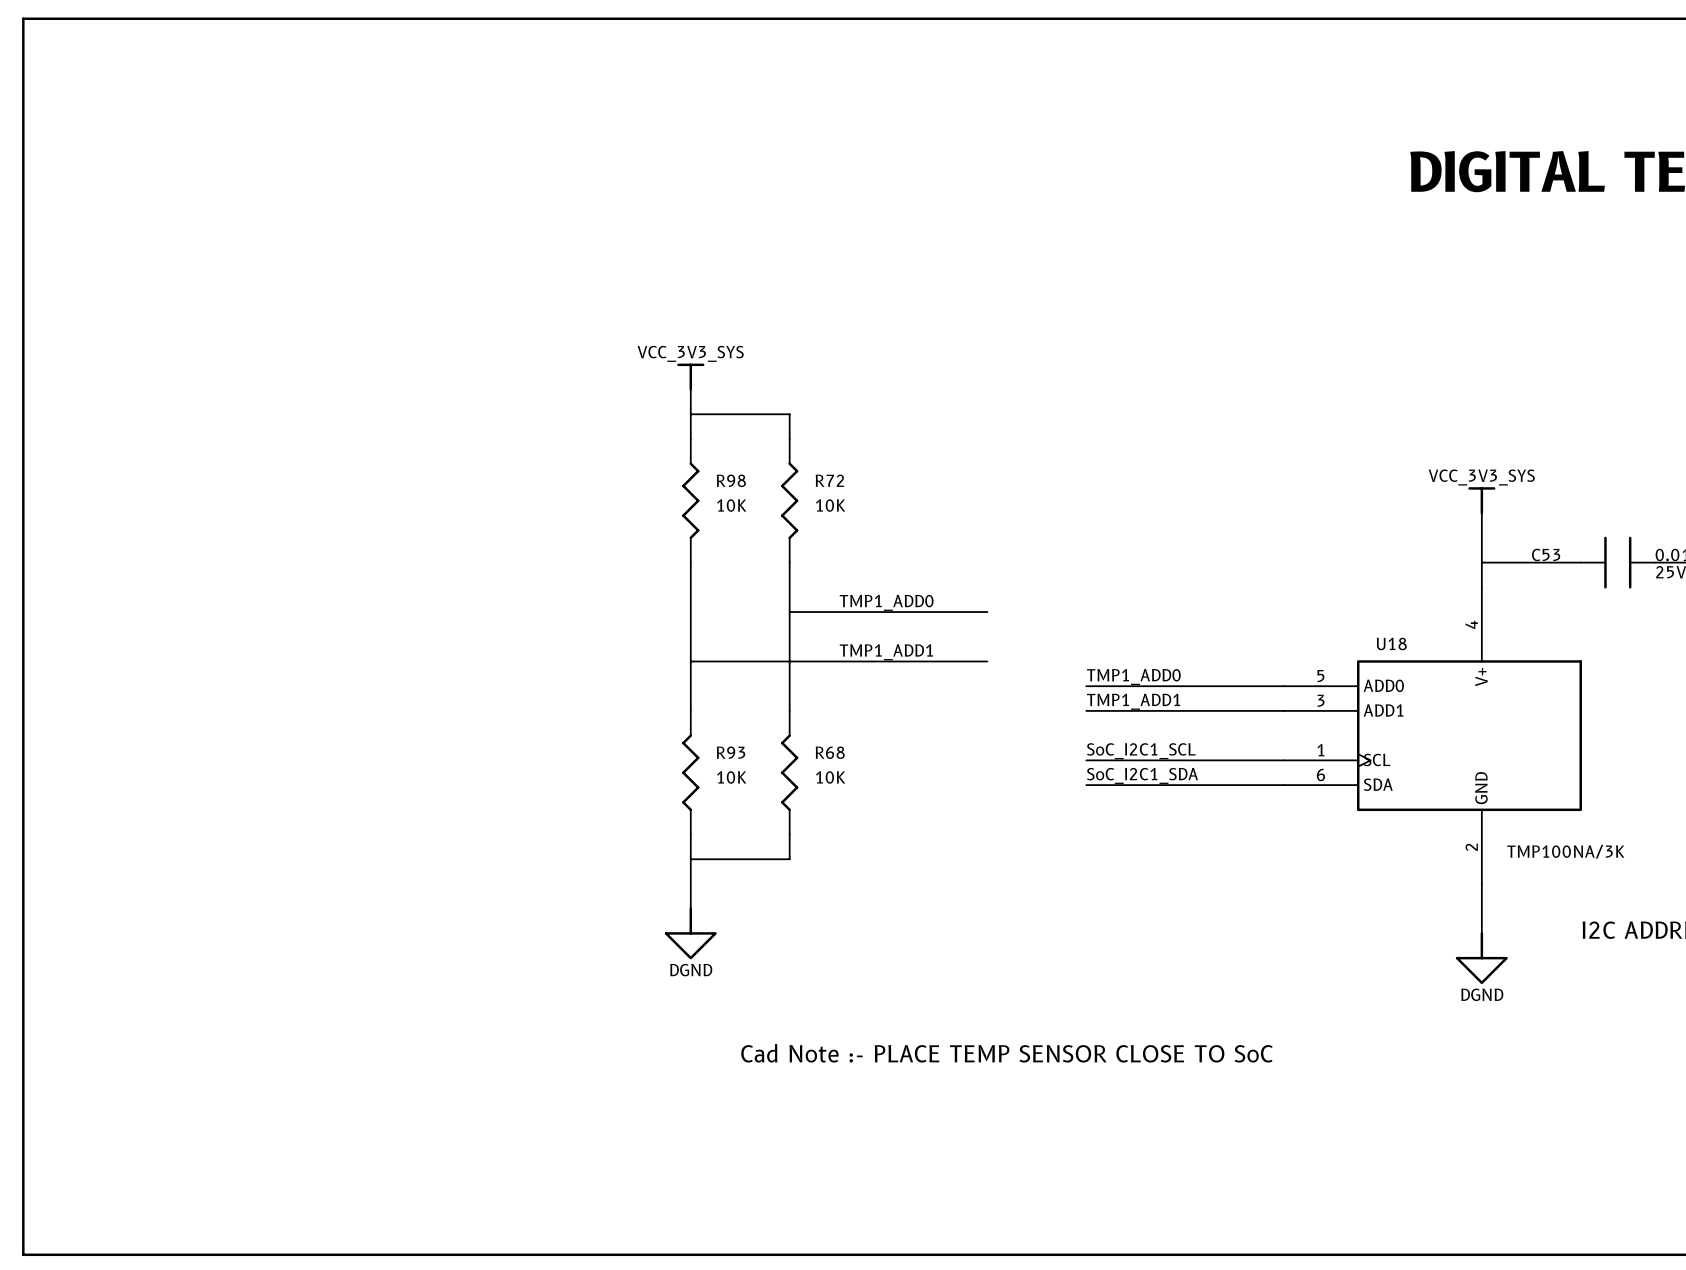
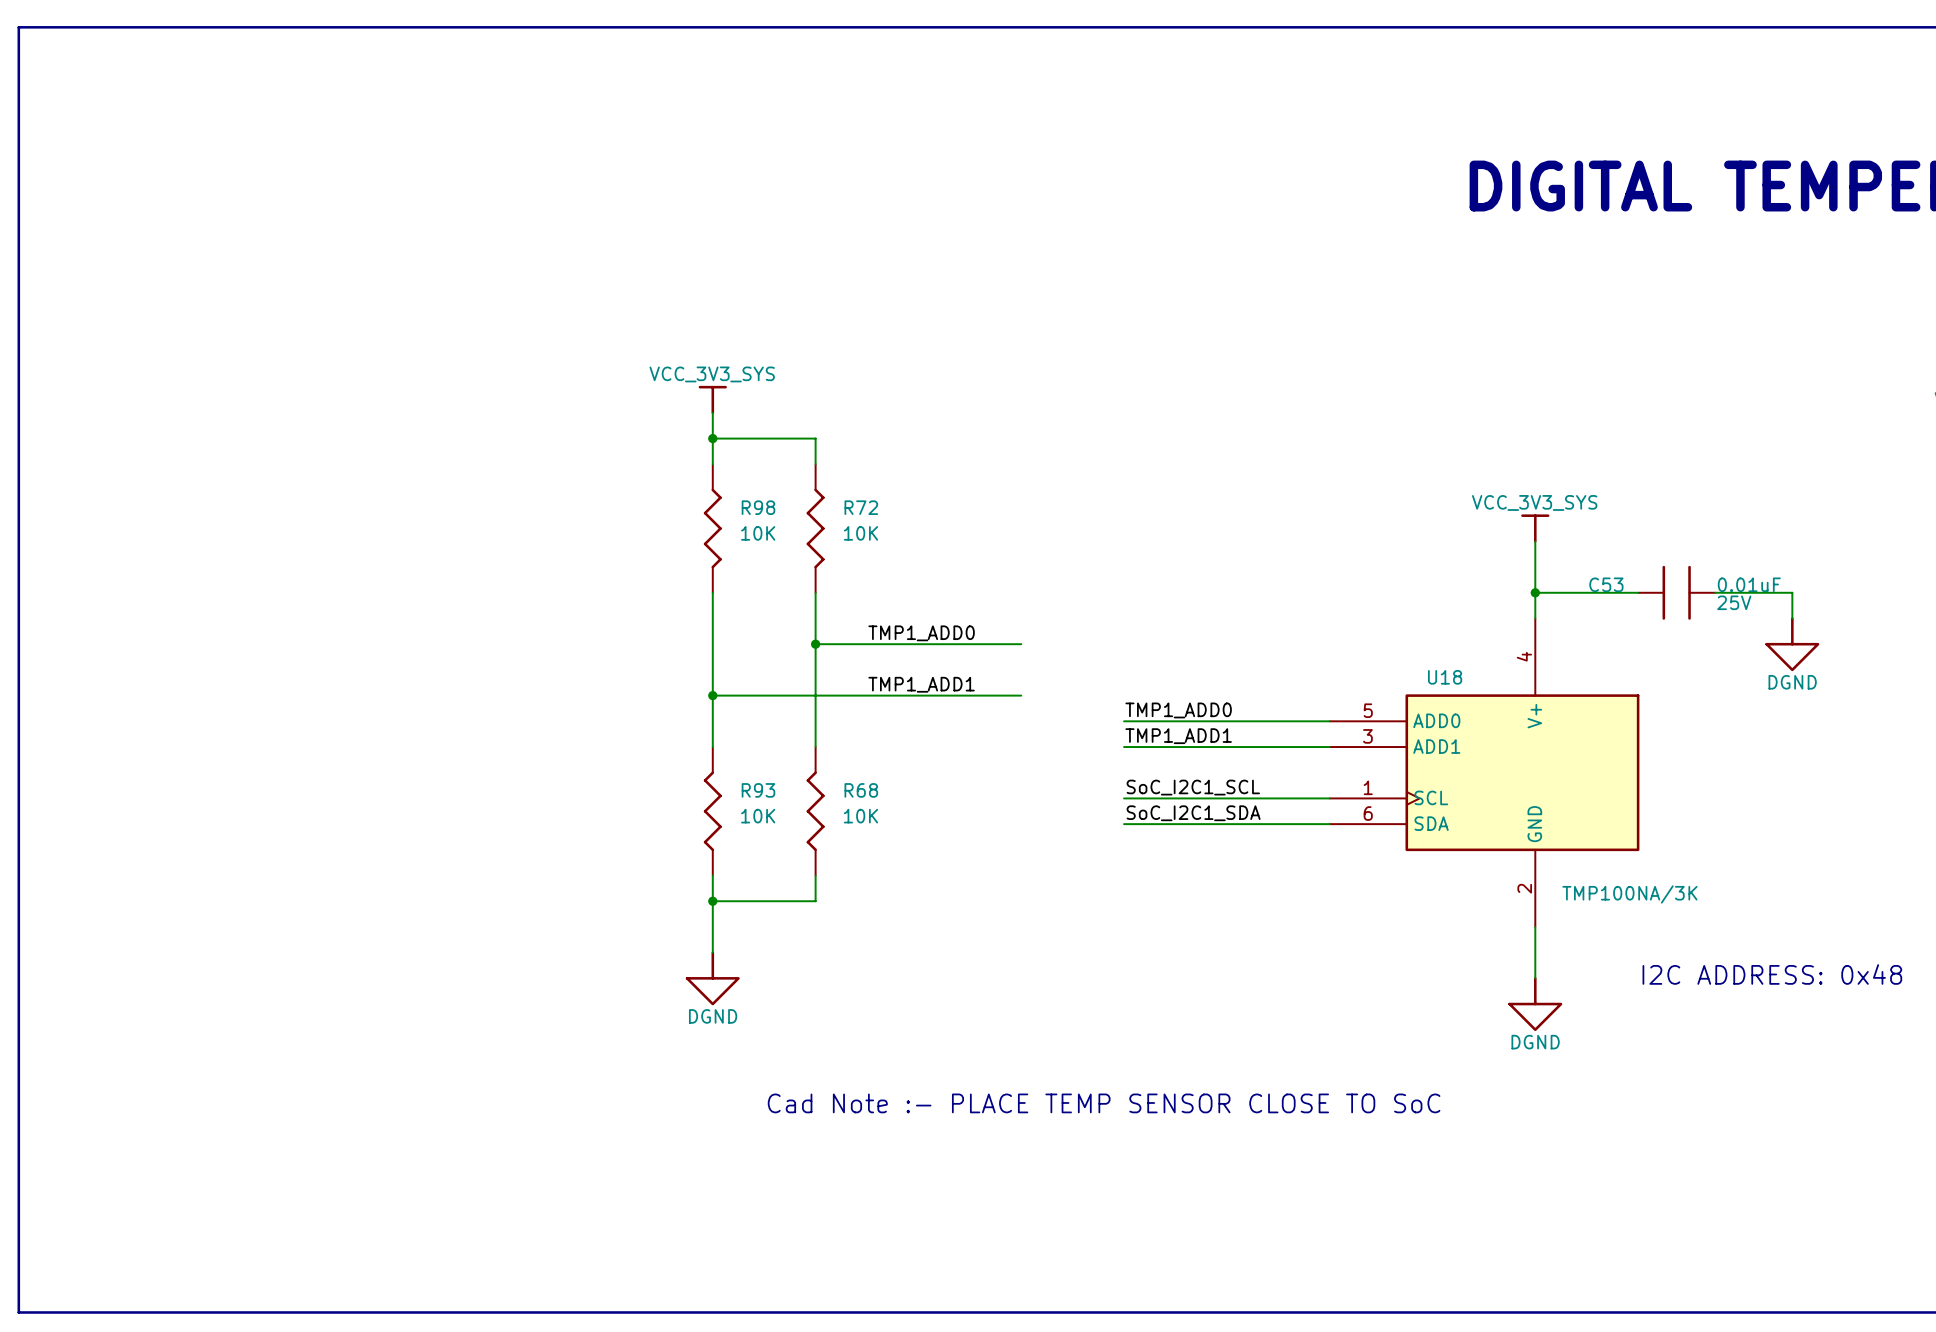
junction: none -> (712, 438)
junction: none -> (1535, 592)
junction: none -> (815, 644)
junction: none -> (712, 695)
junction: none -> (712, 901)

